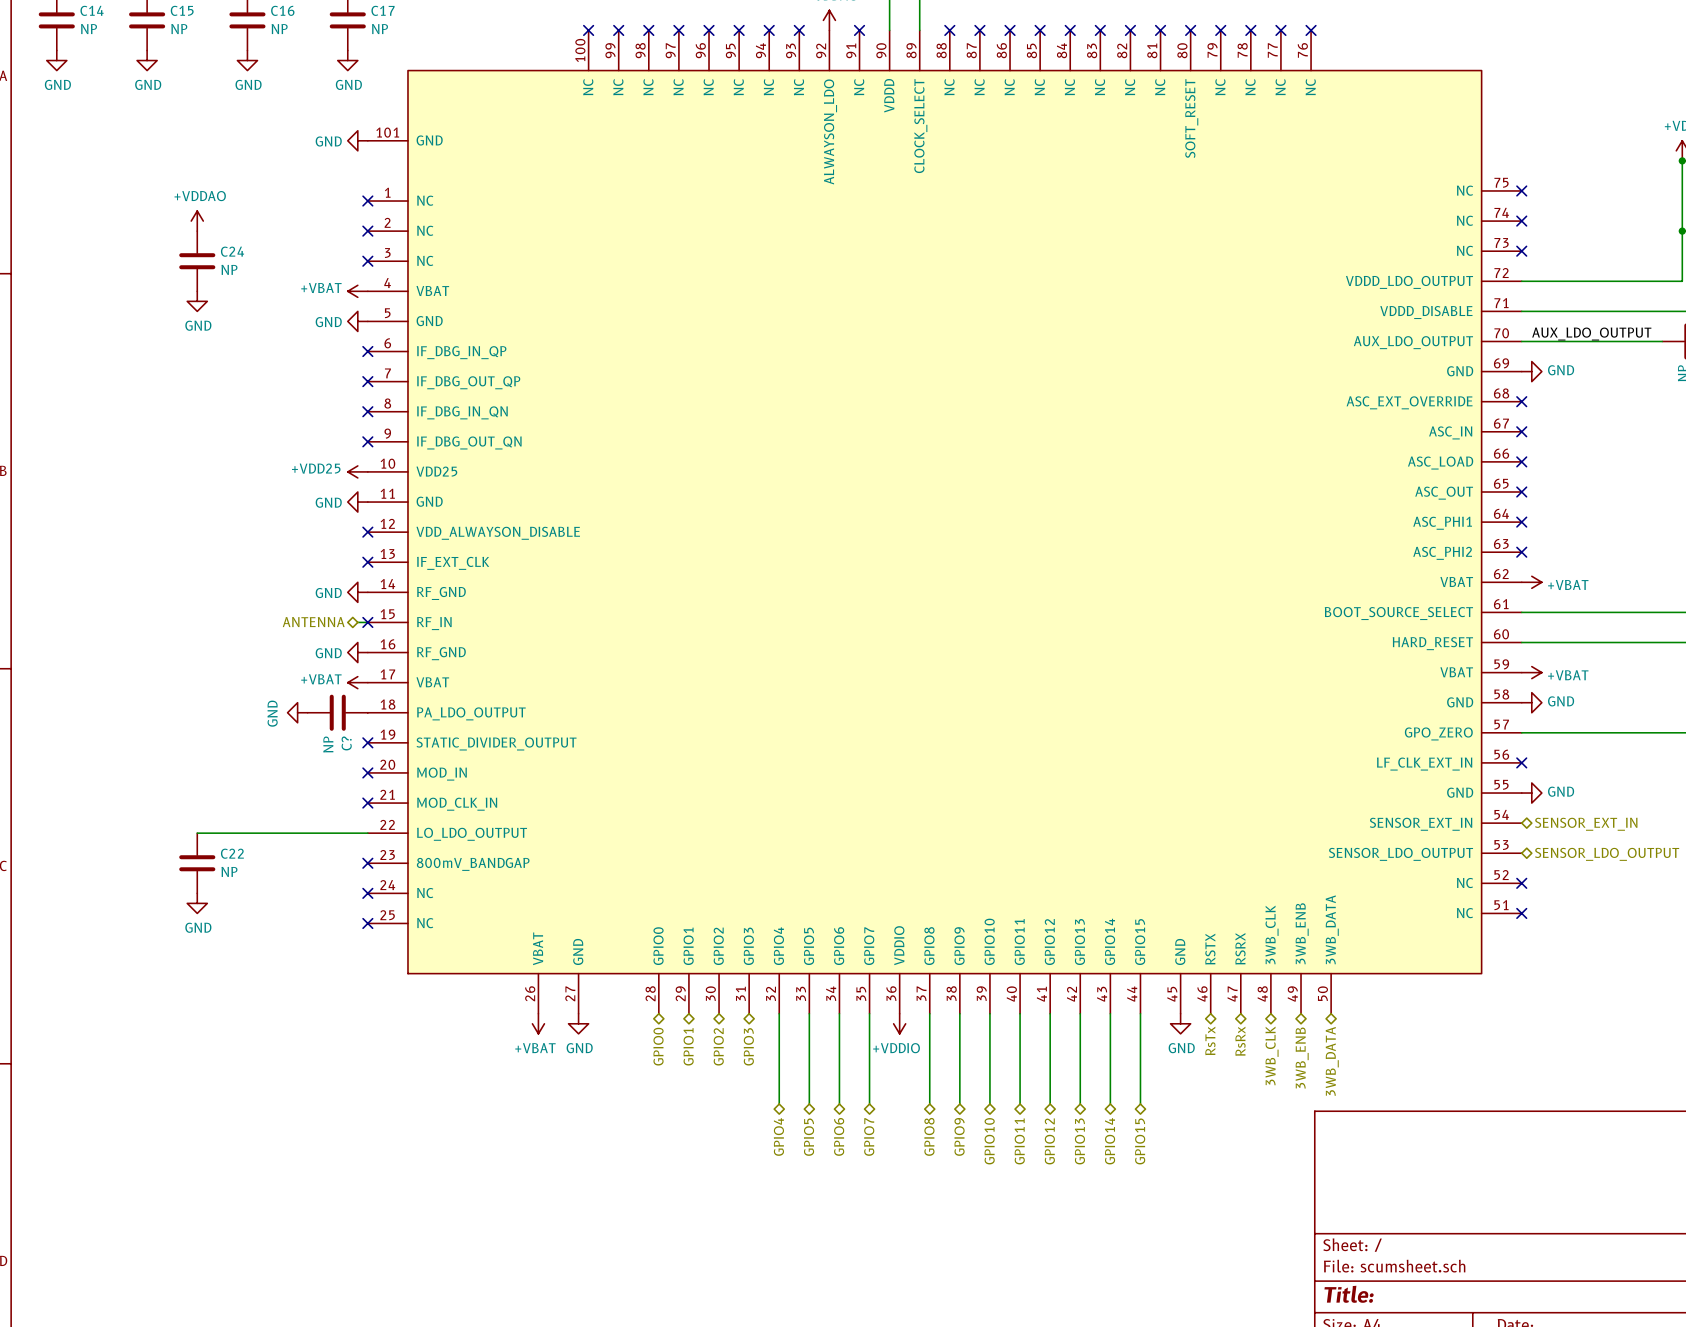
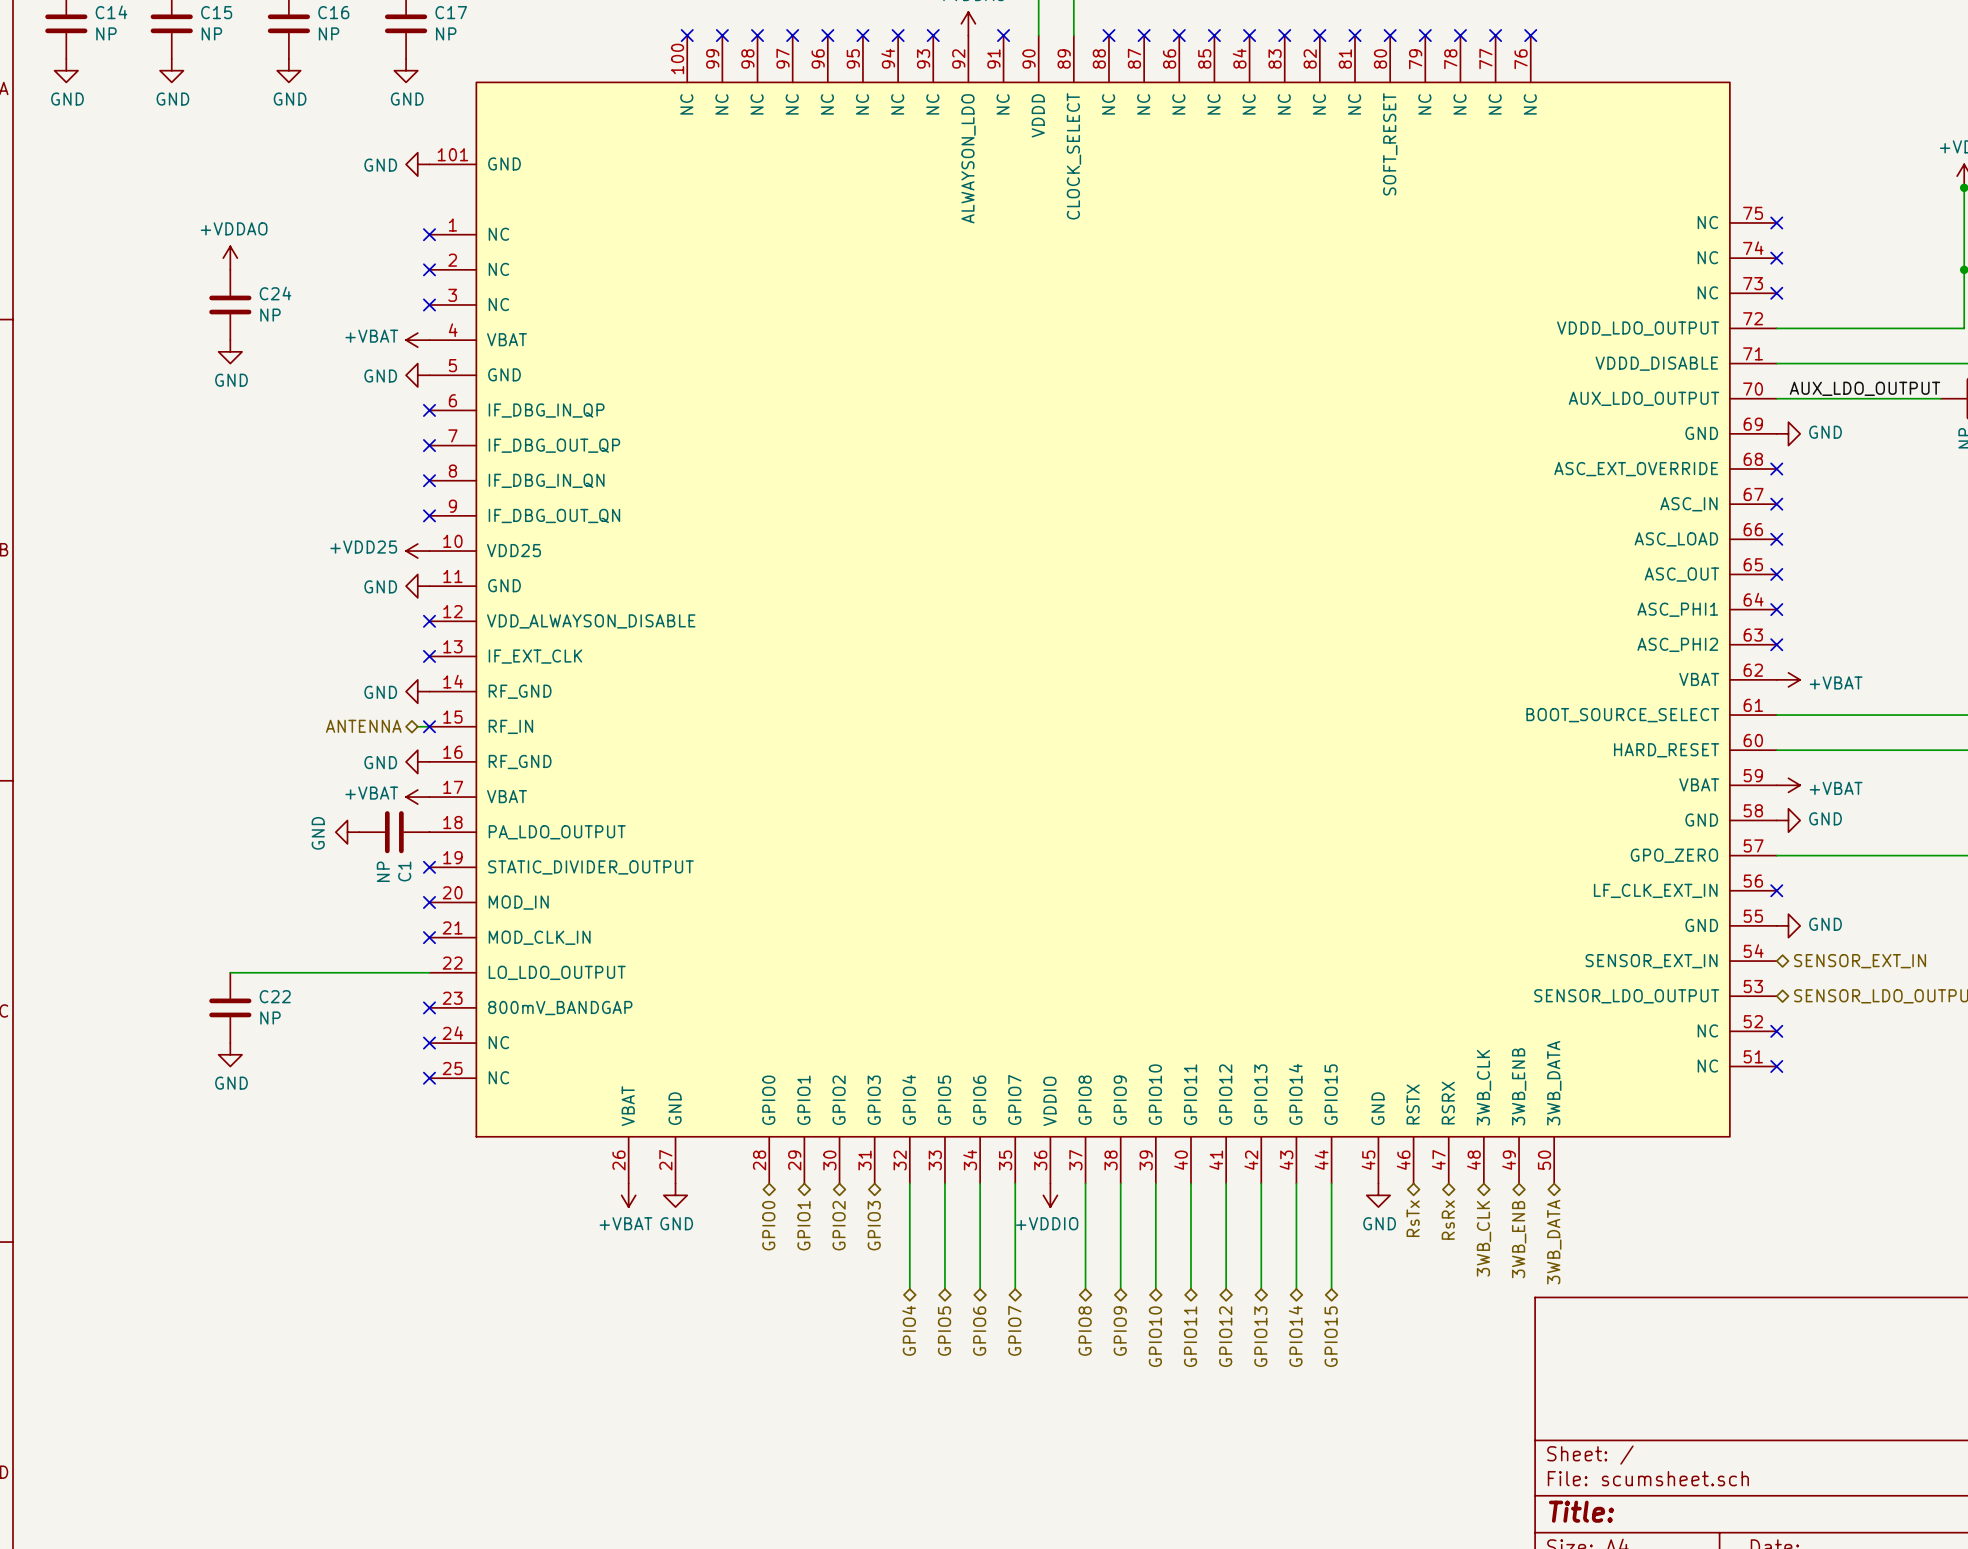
C? name: C? (346, 743) -> C1 (404, 871)

